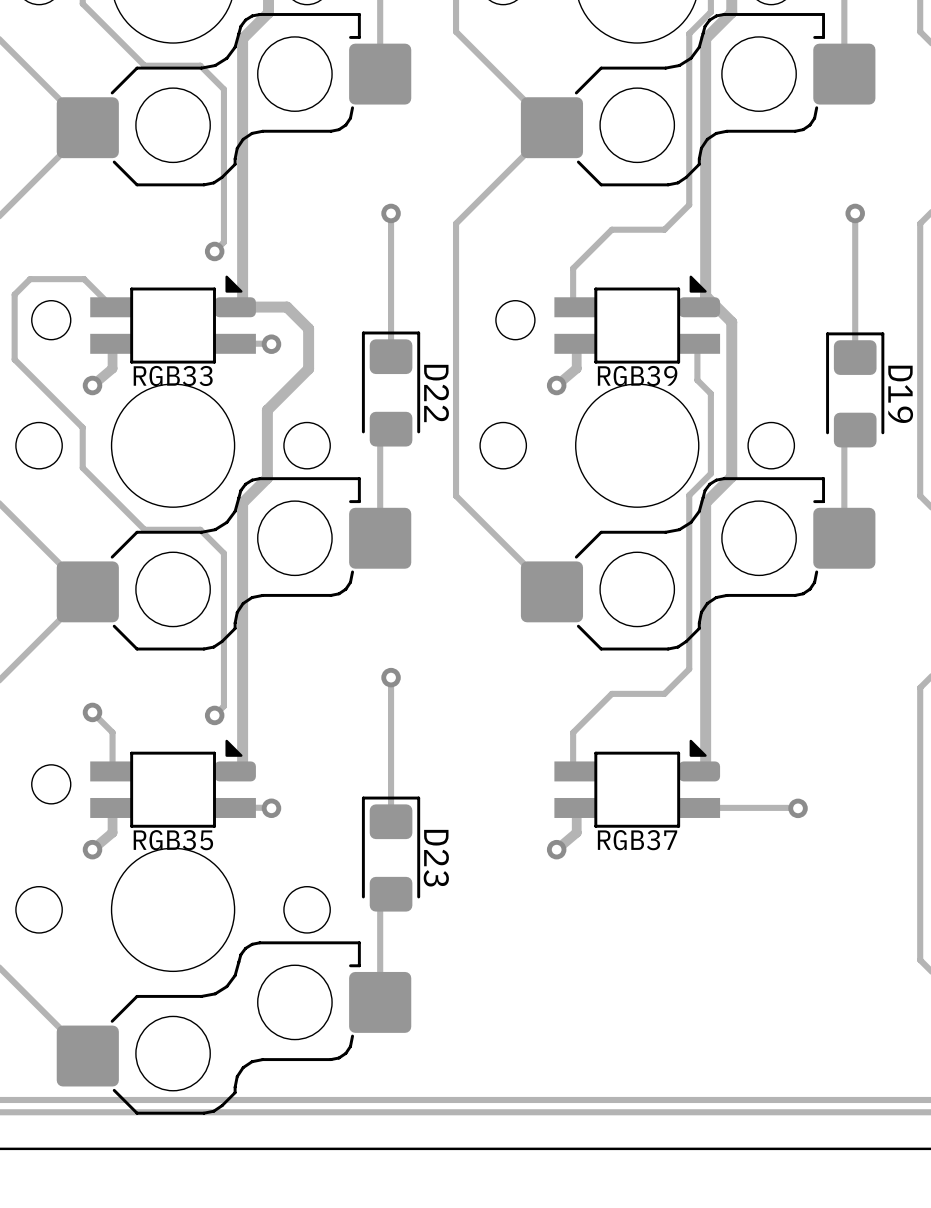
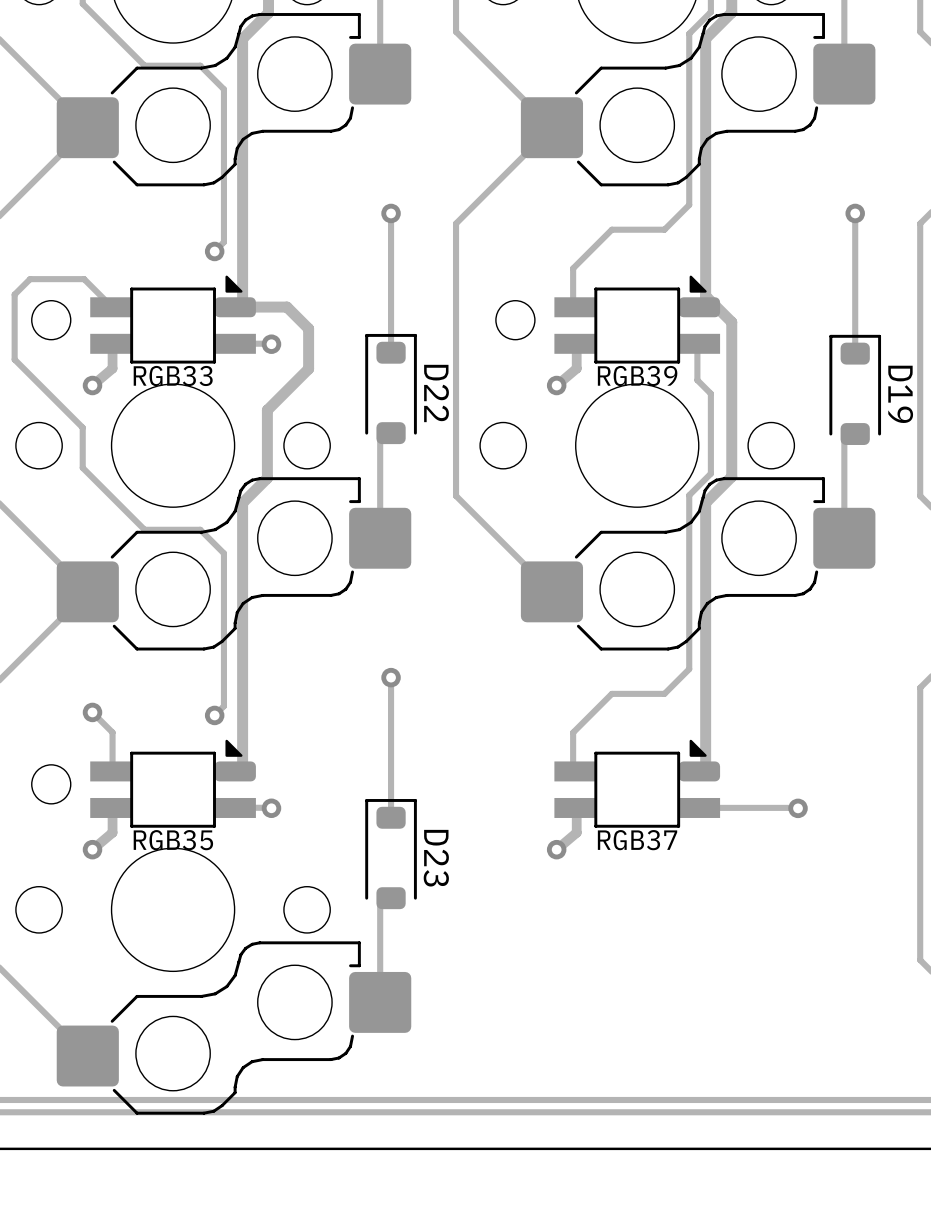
D22 footprint: [361, 331, 421, 447] -> [365, 333, 417, 445]
D19 footprint: [826, 332, 885, 448] -> [829, 334, 882, 445]
D23 footprint: [361, 796, 421, 912] -> [365, 799, 417, 910]

